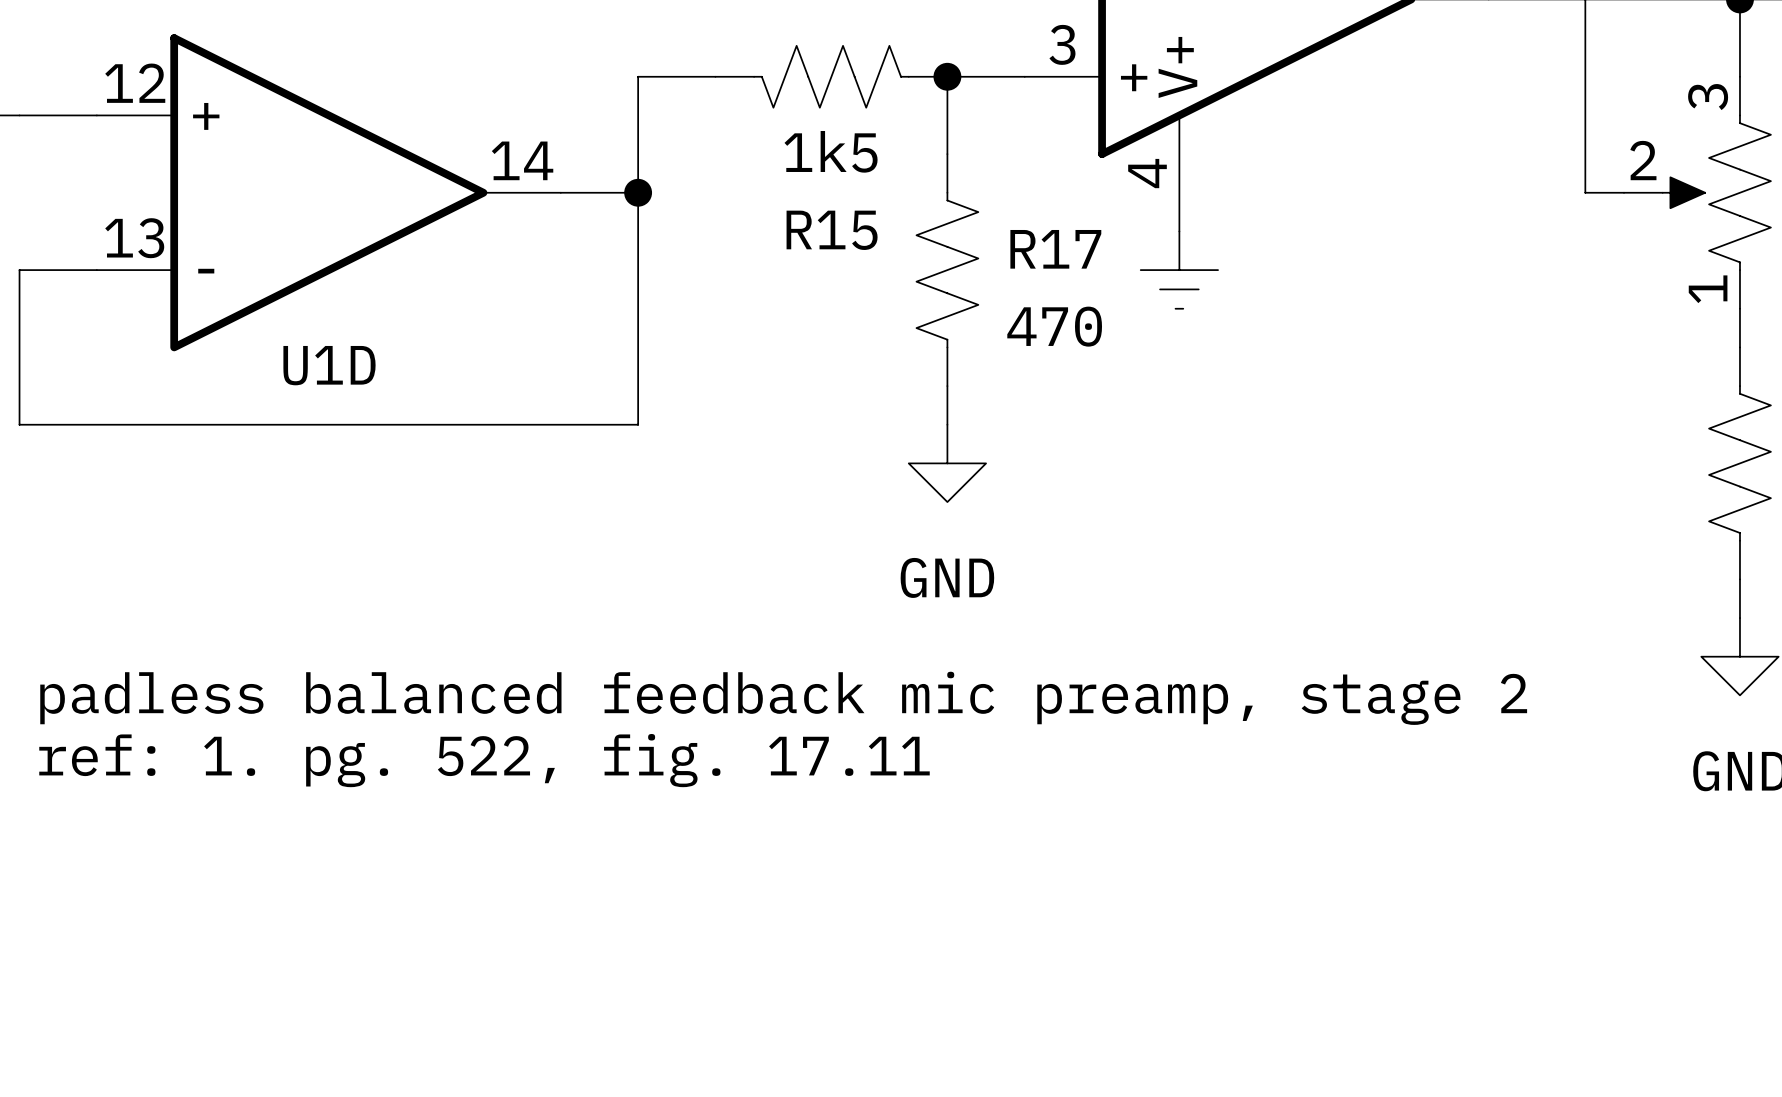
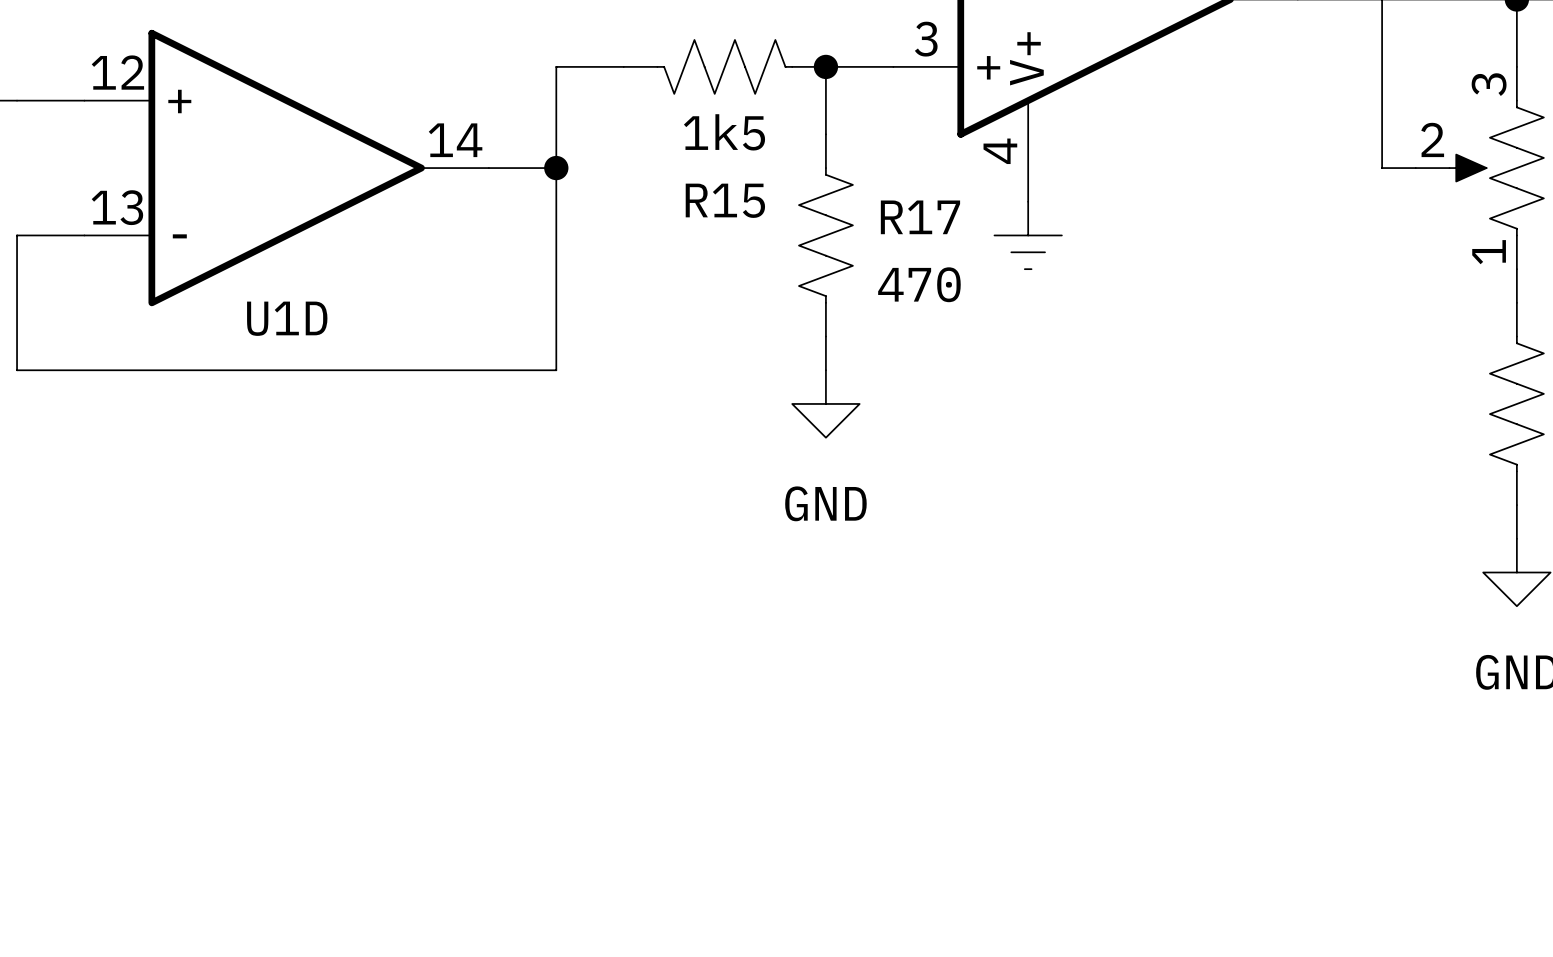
text: padless balanced feedback mic preamp, stage 2 (783, 698) -> none
text: ref: 1. pg. 522, fig. 17.11 (484, 760) -> none

